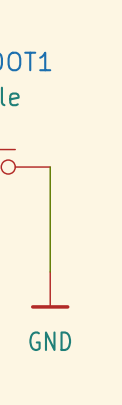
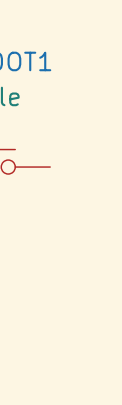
wire: (50, 167) (50, 271) -> none
power symbol: GND (50, 290) -> none

